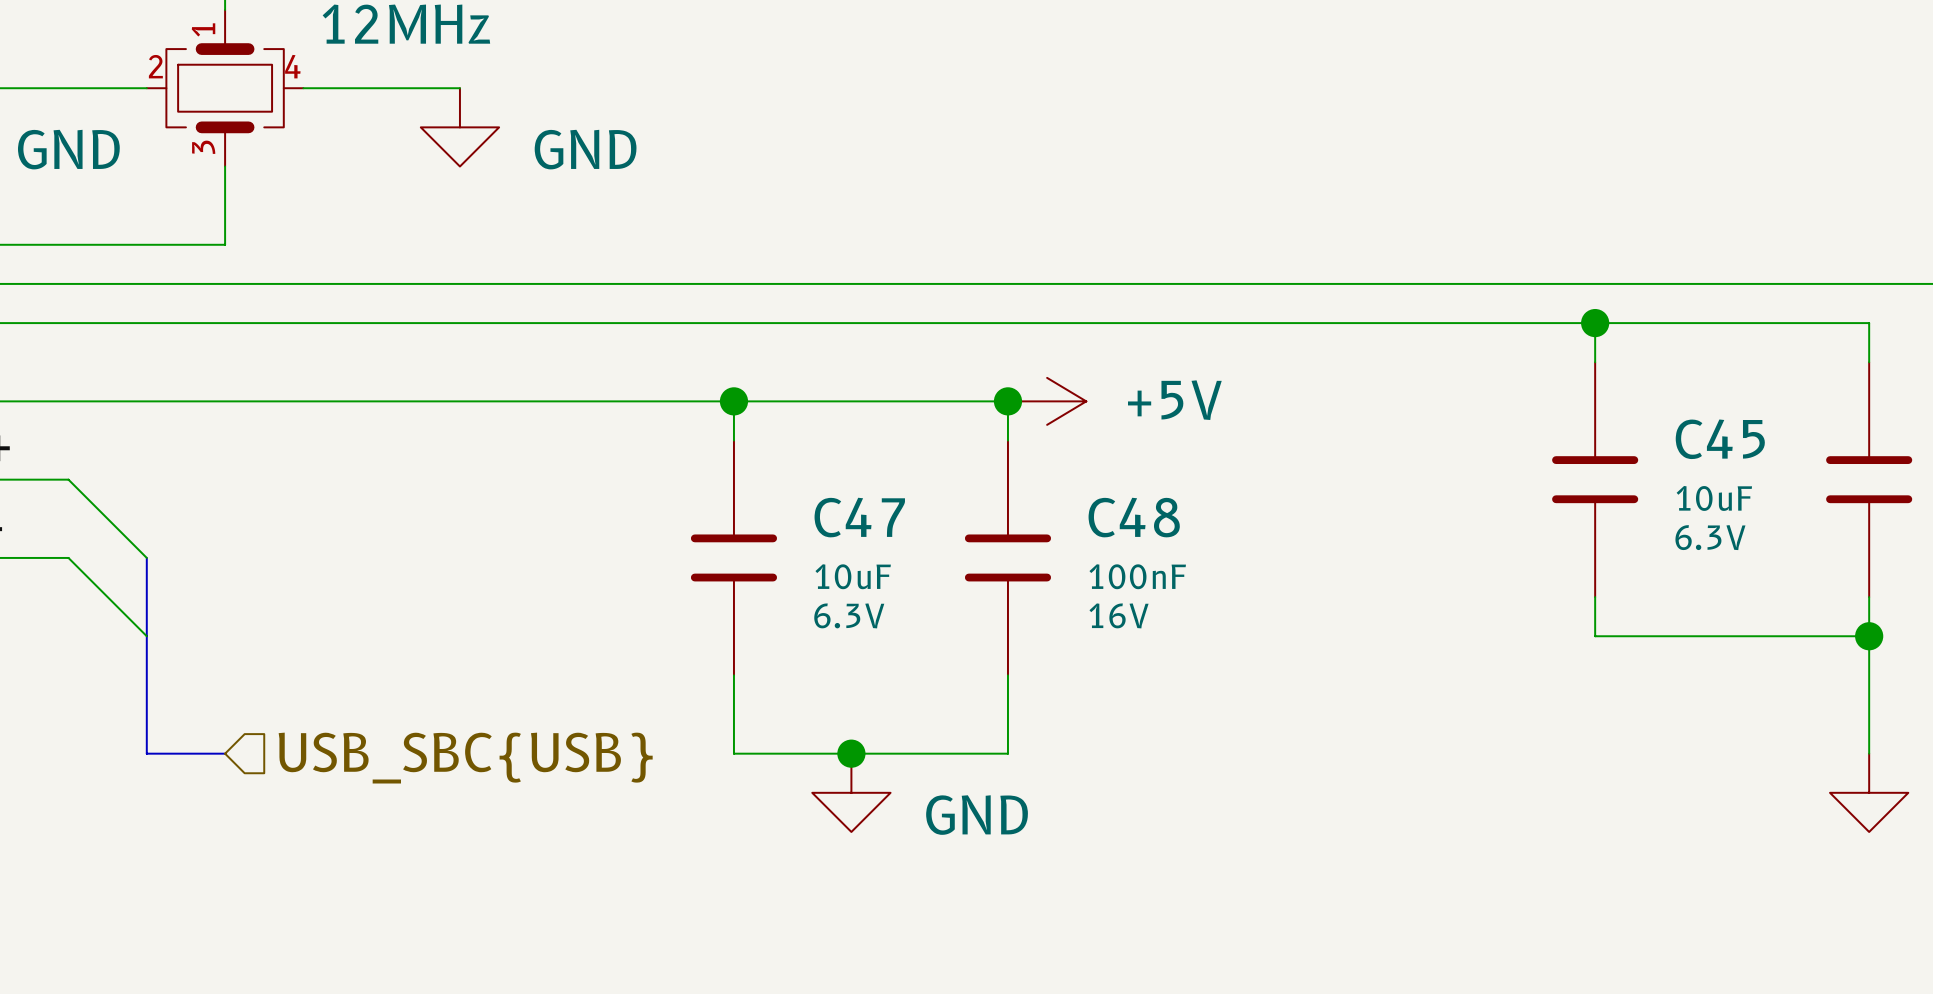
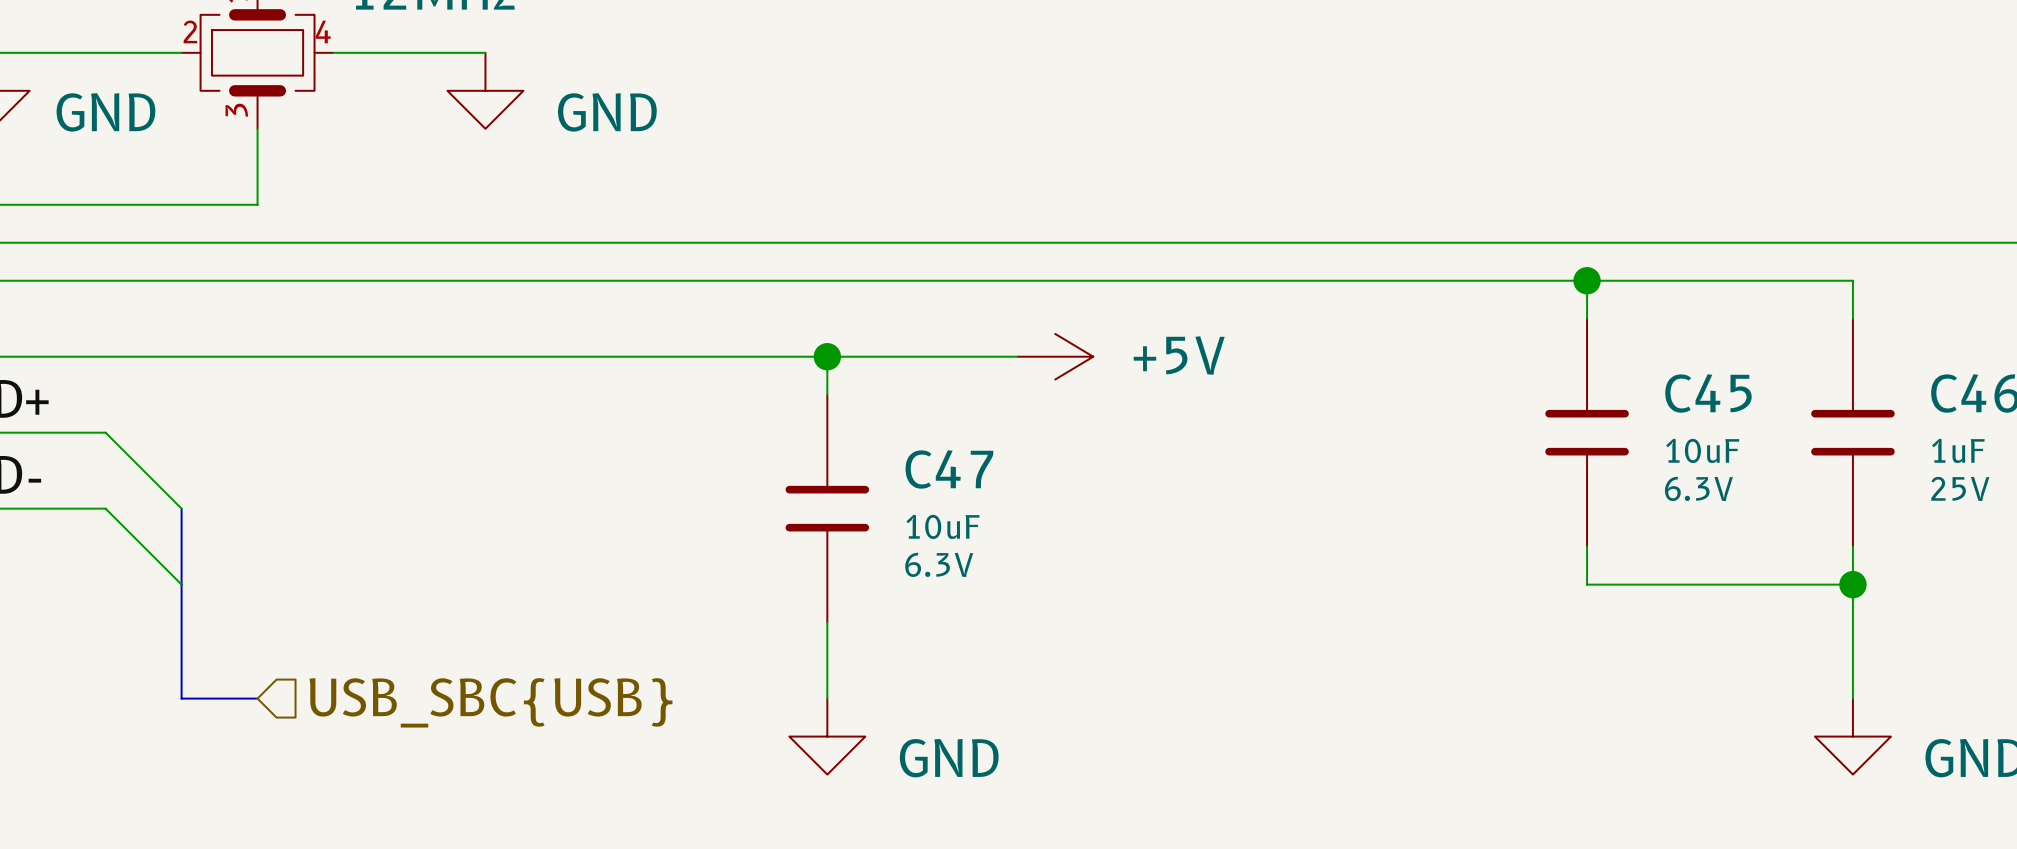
wire: (733, 401) (733, 440) -> (827, 356) (827, 394)
junction position: (733, 401) -> (827, 356)
wire: (1007, 401) (1007, 440) -> none
junction: (1007, 401) -> none
C47 position: (733, 557) -> (827, 508)
C48: 100nF (1007, 557) -> none
wire: (733, 675) (733, 753) (1007, 753) (1007, 675) -> none
wire: none -> (827, 622) (827, 698)
junction: (851, 753) -> none
power symbol position: GND (851, 792) -> GND (827, 736)

